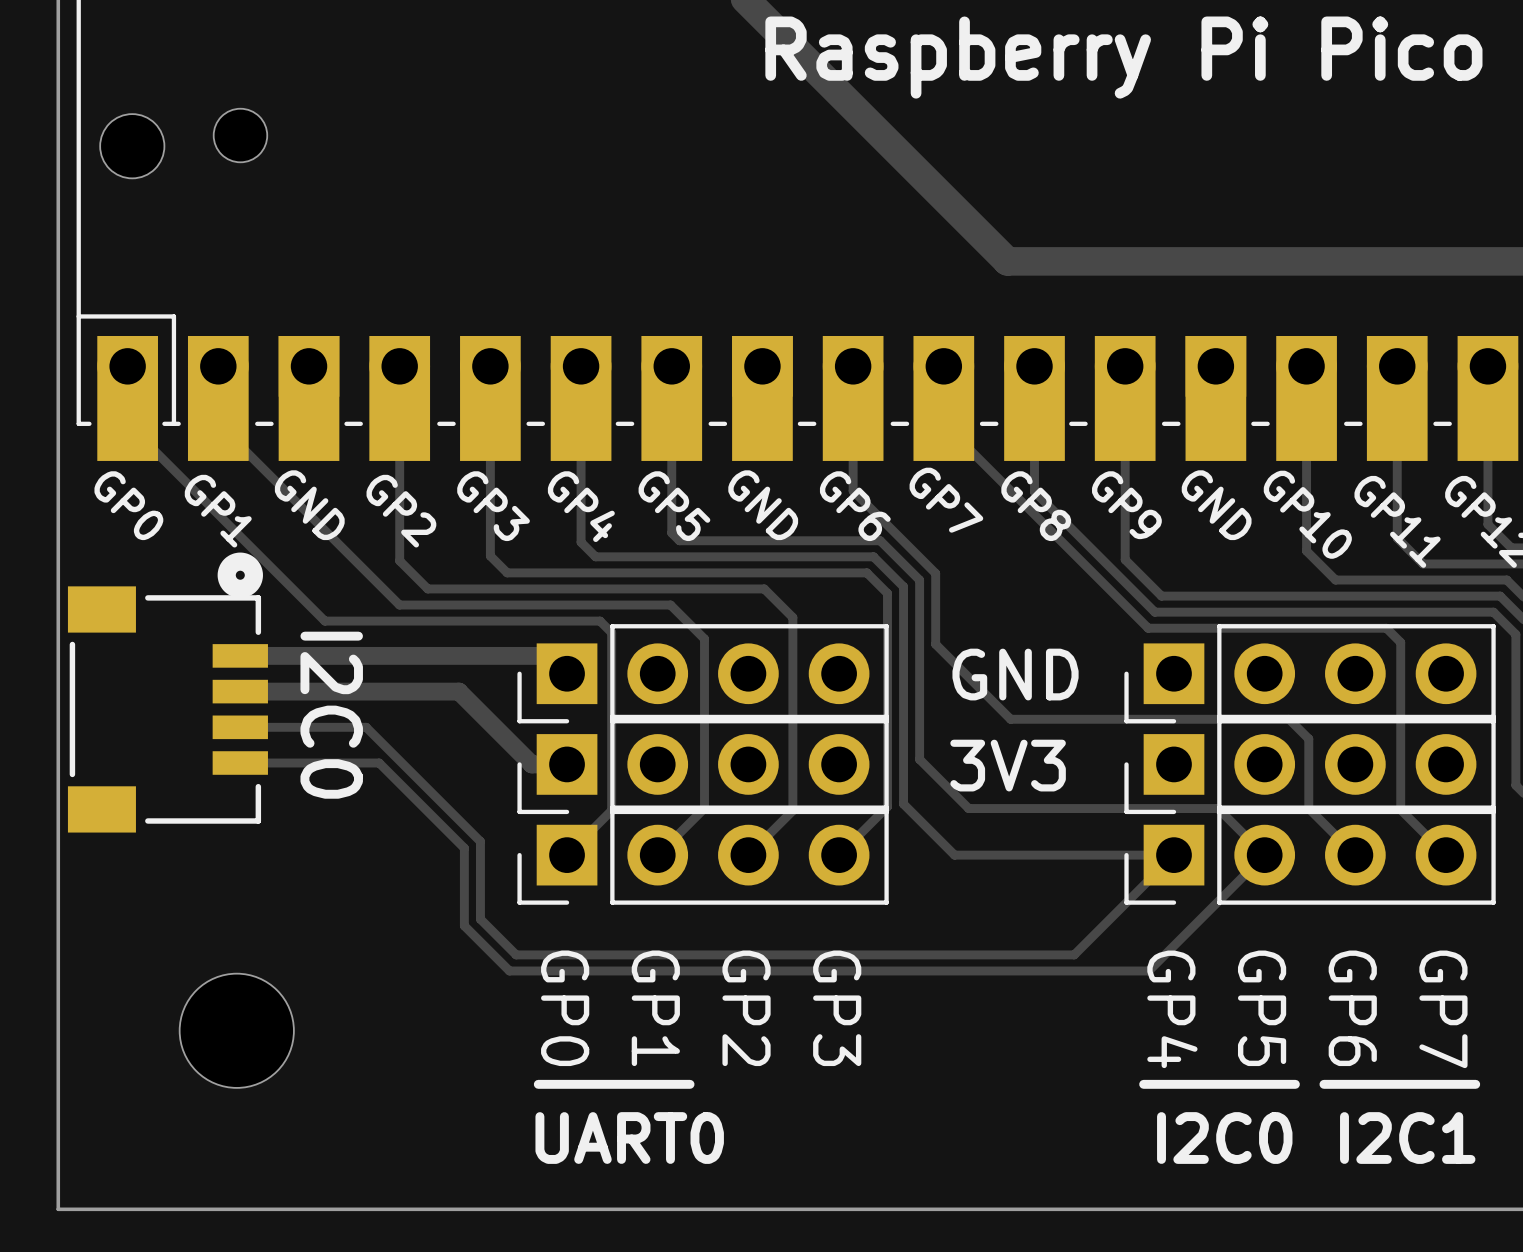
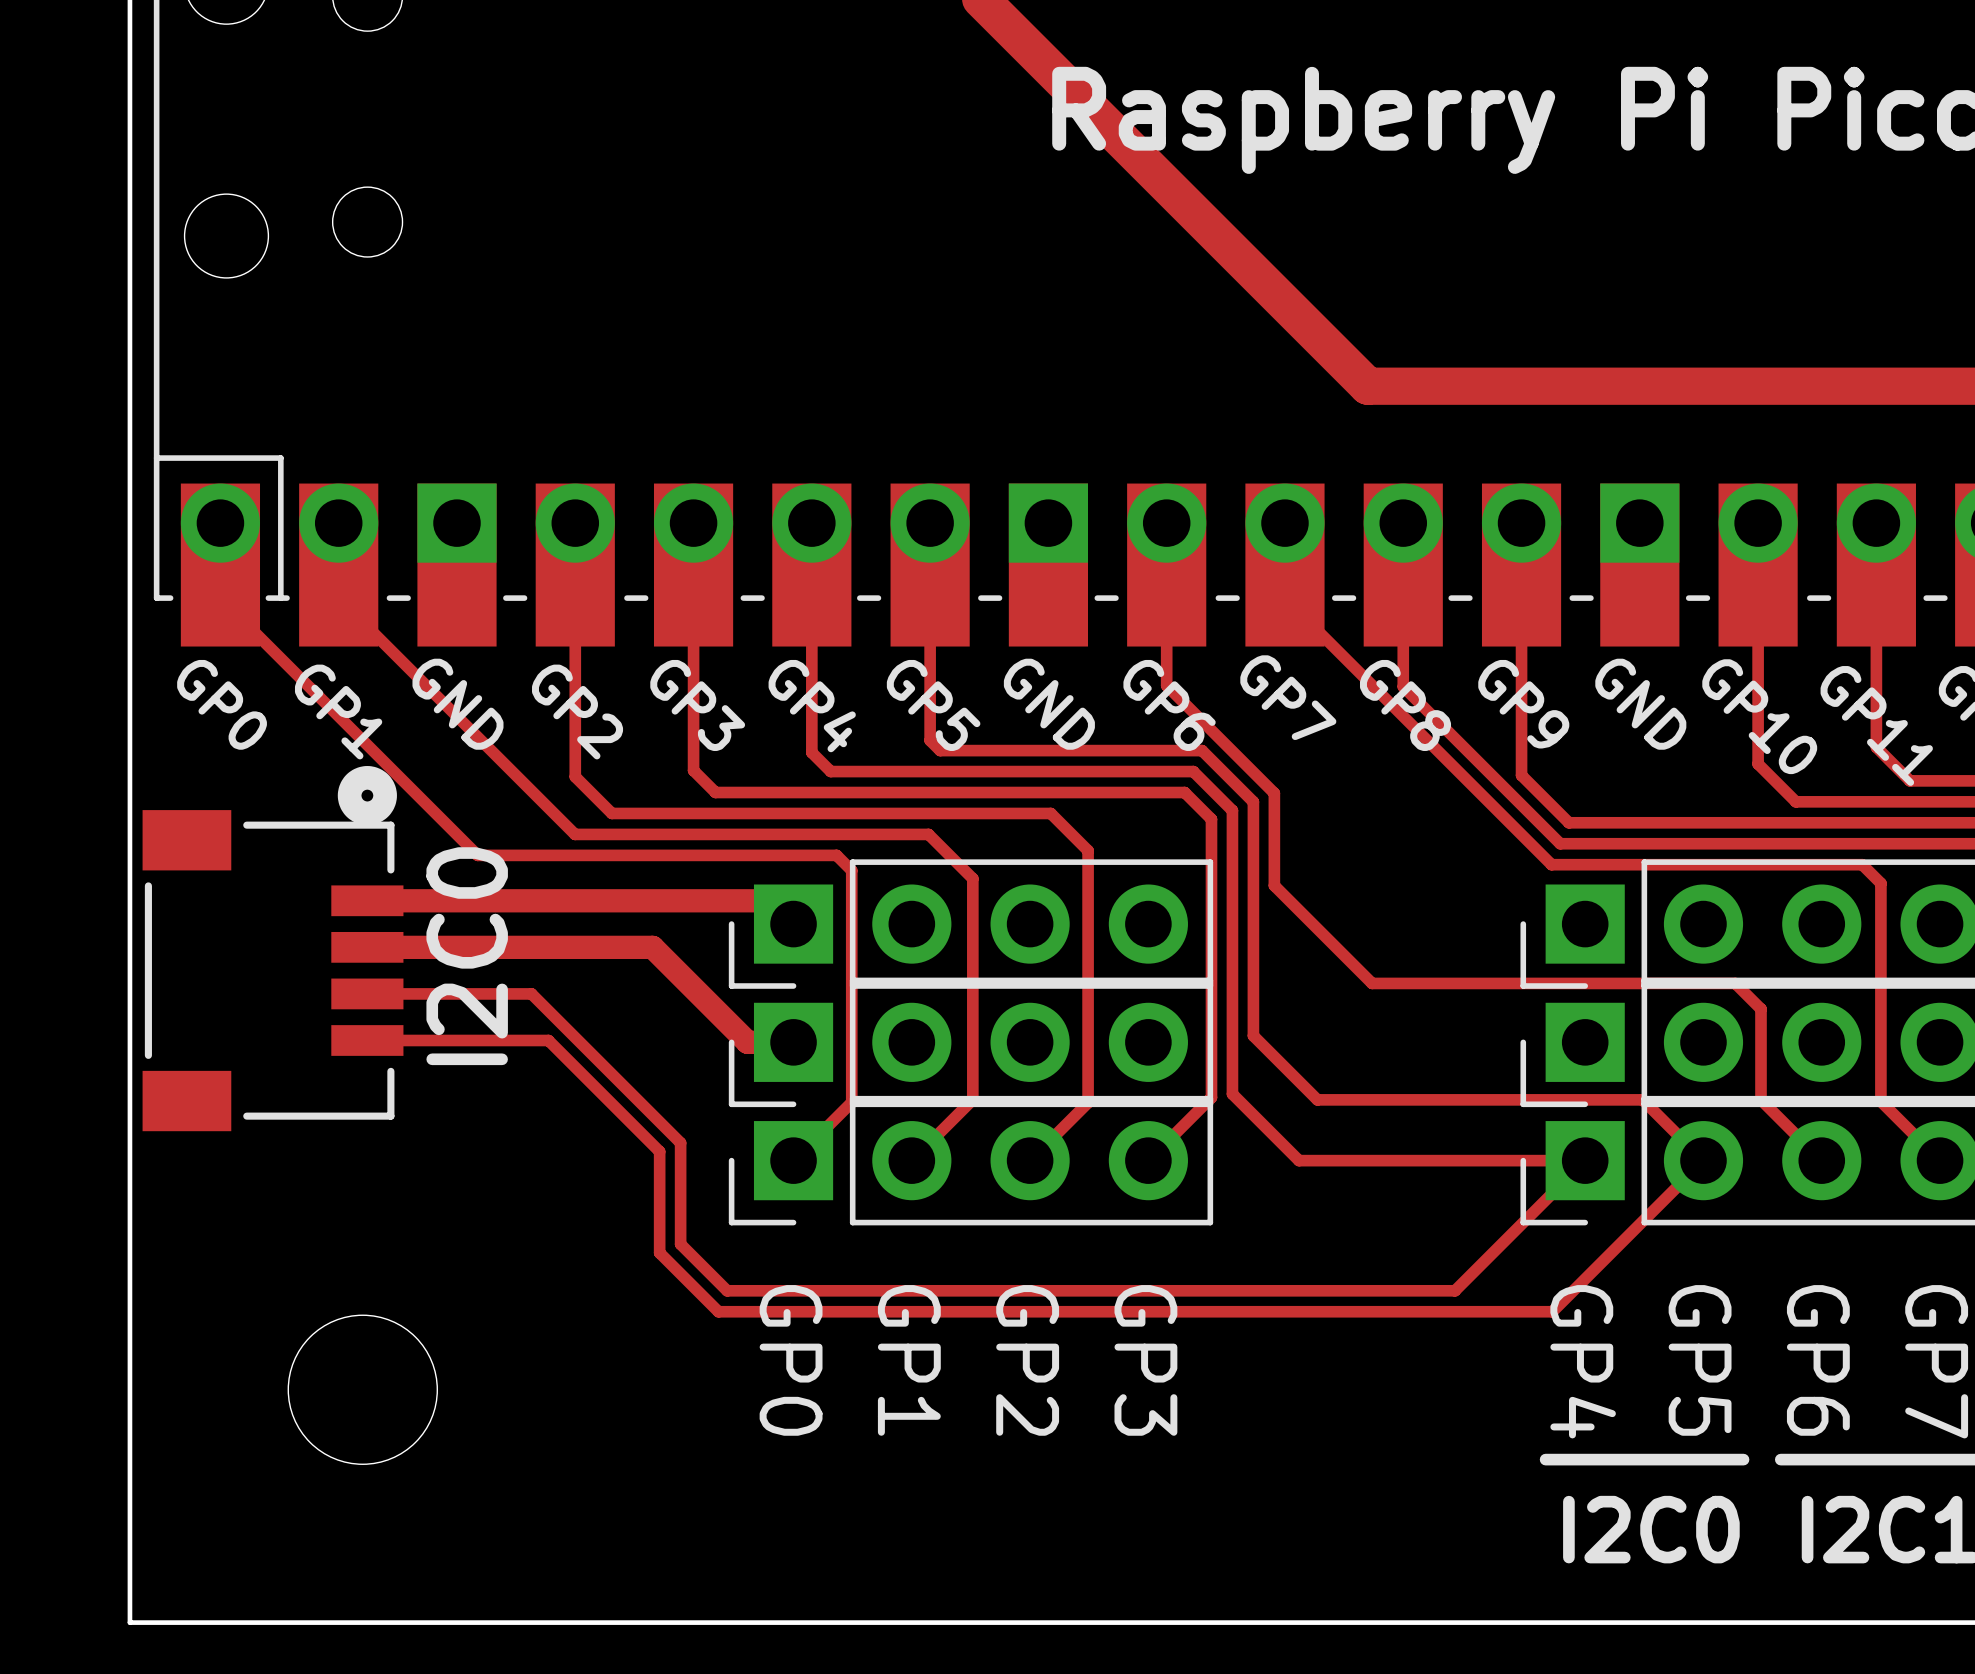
text: GND (1015, 674) -> none
text rotation: 0° (331, 715) -> 180° (467, 956)
text: 3V3 (1008, 765) -> none
line: (538, 1084) (690, 1084) -> none
text: UART0 (629, 1138) -> none

